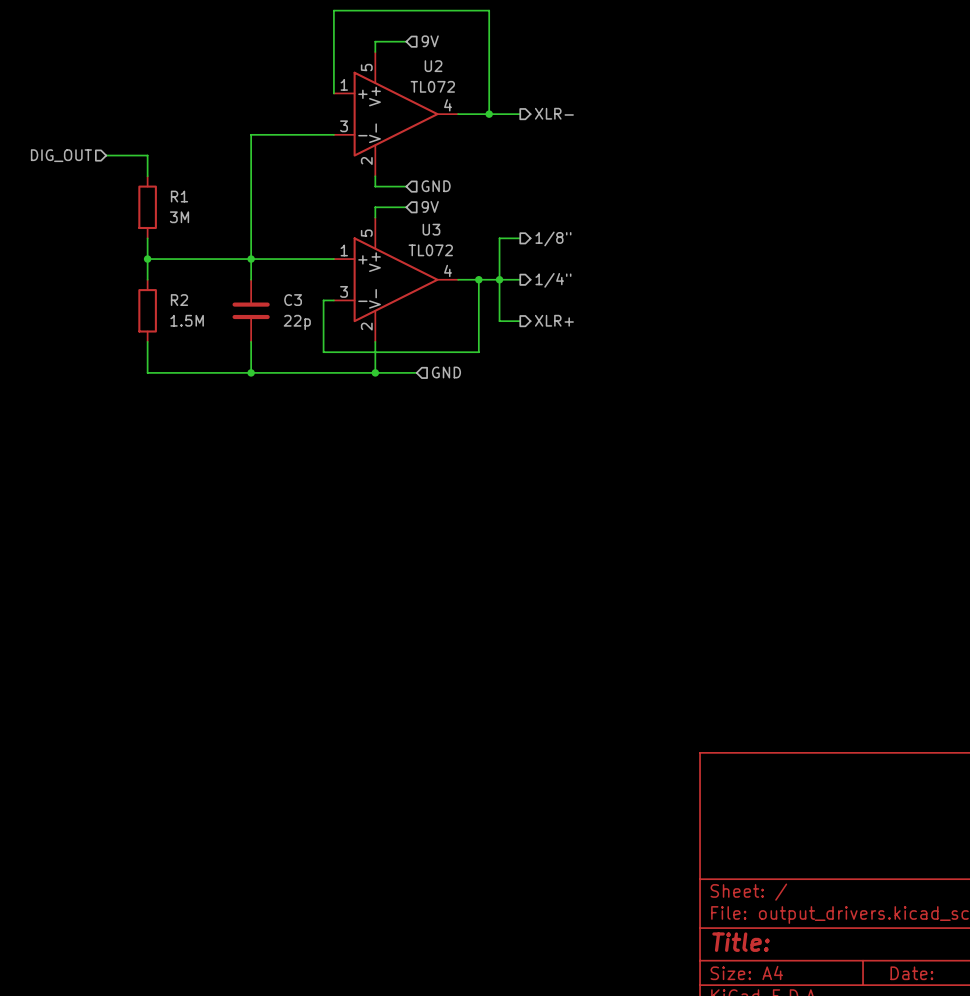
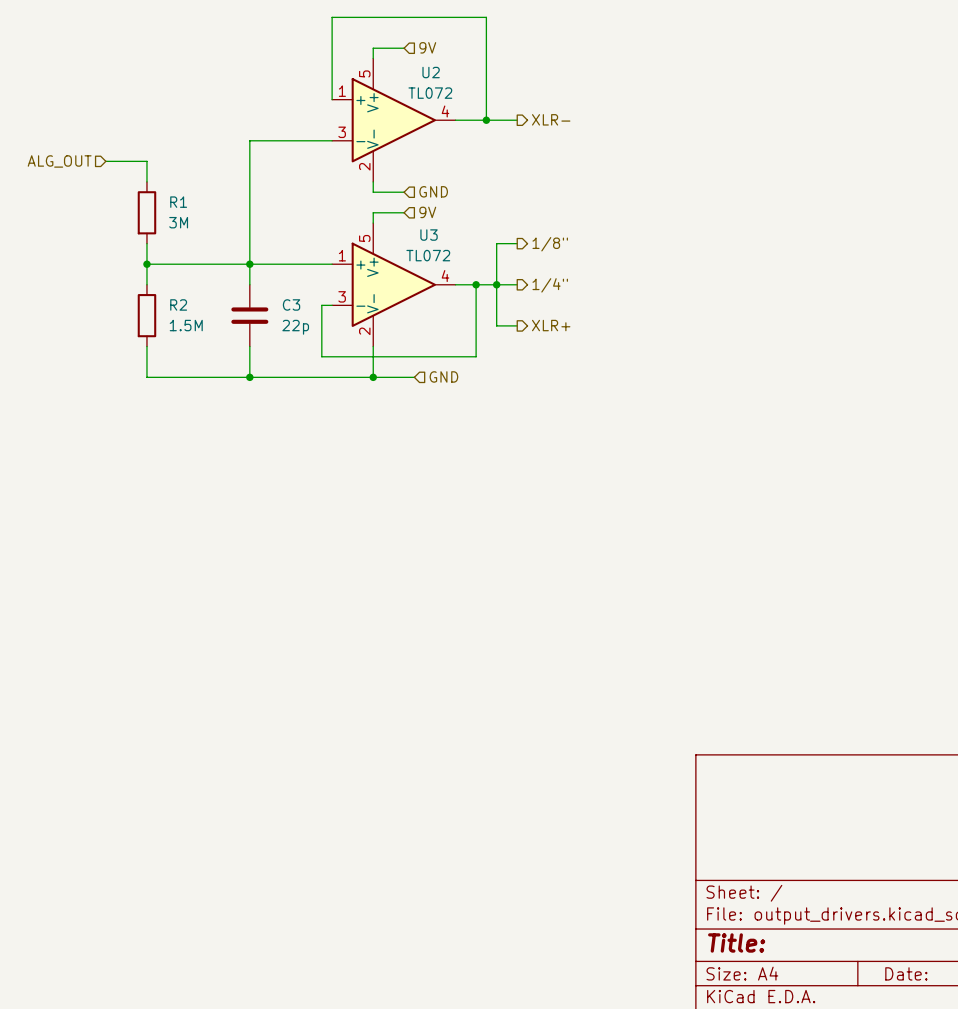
hierarchical label: DIG_OUT (61, 155) -> ALG_OUT (59, 161)

